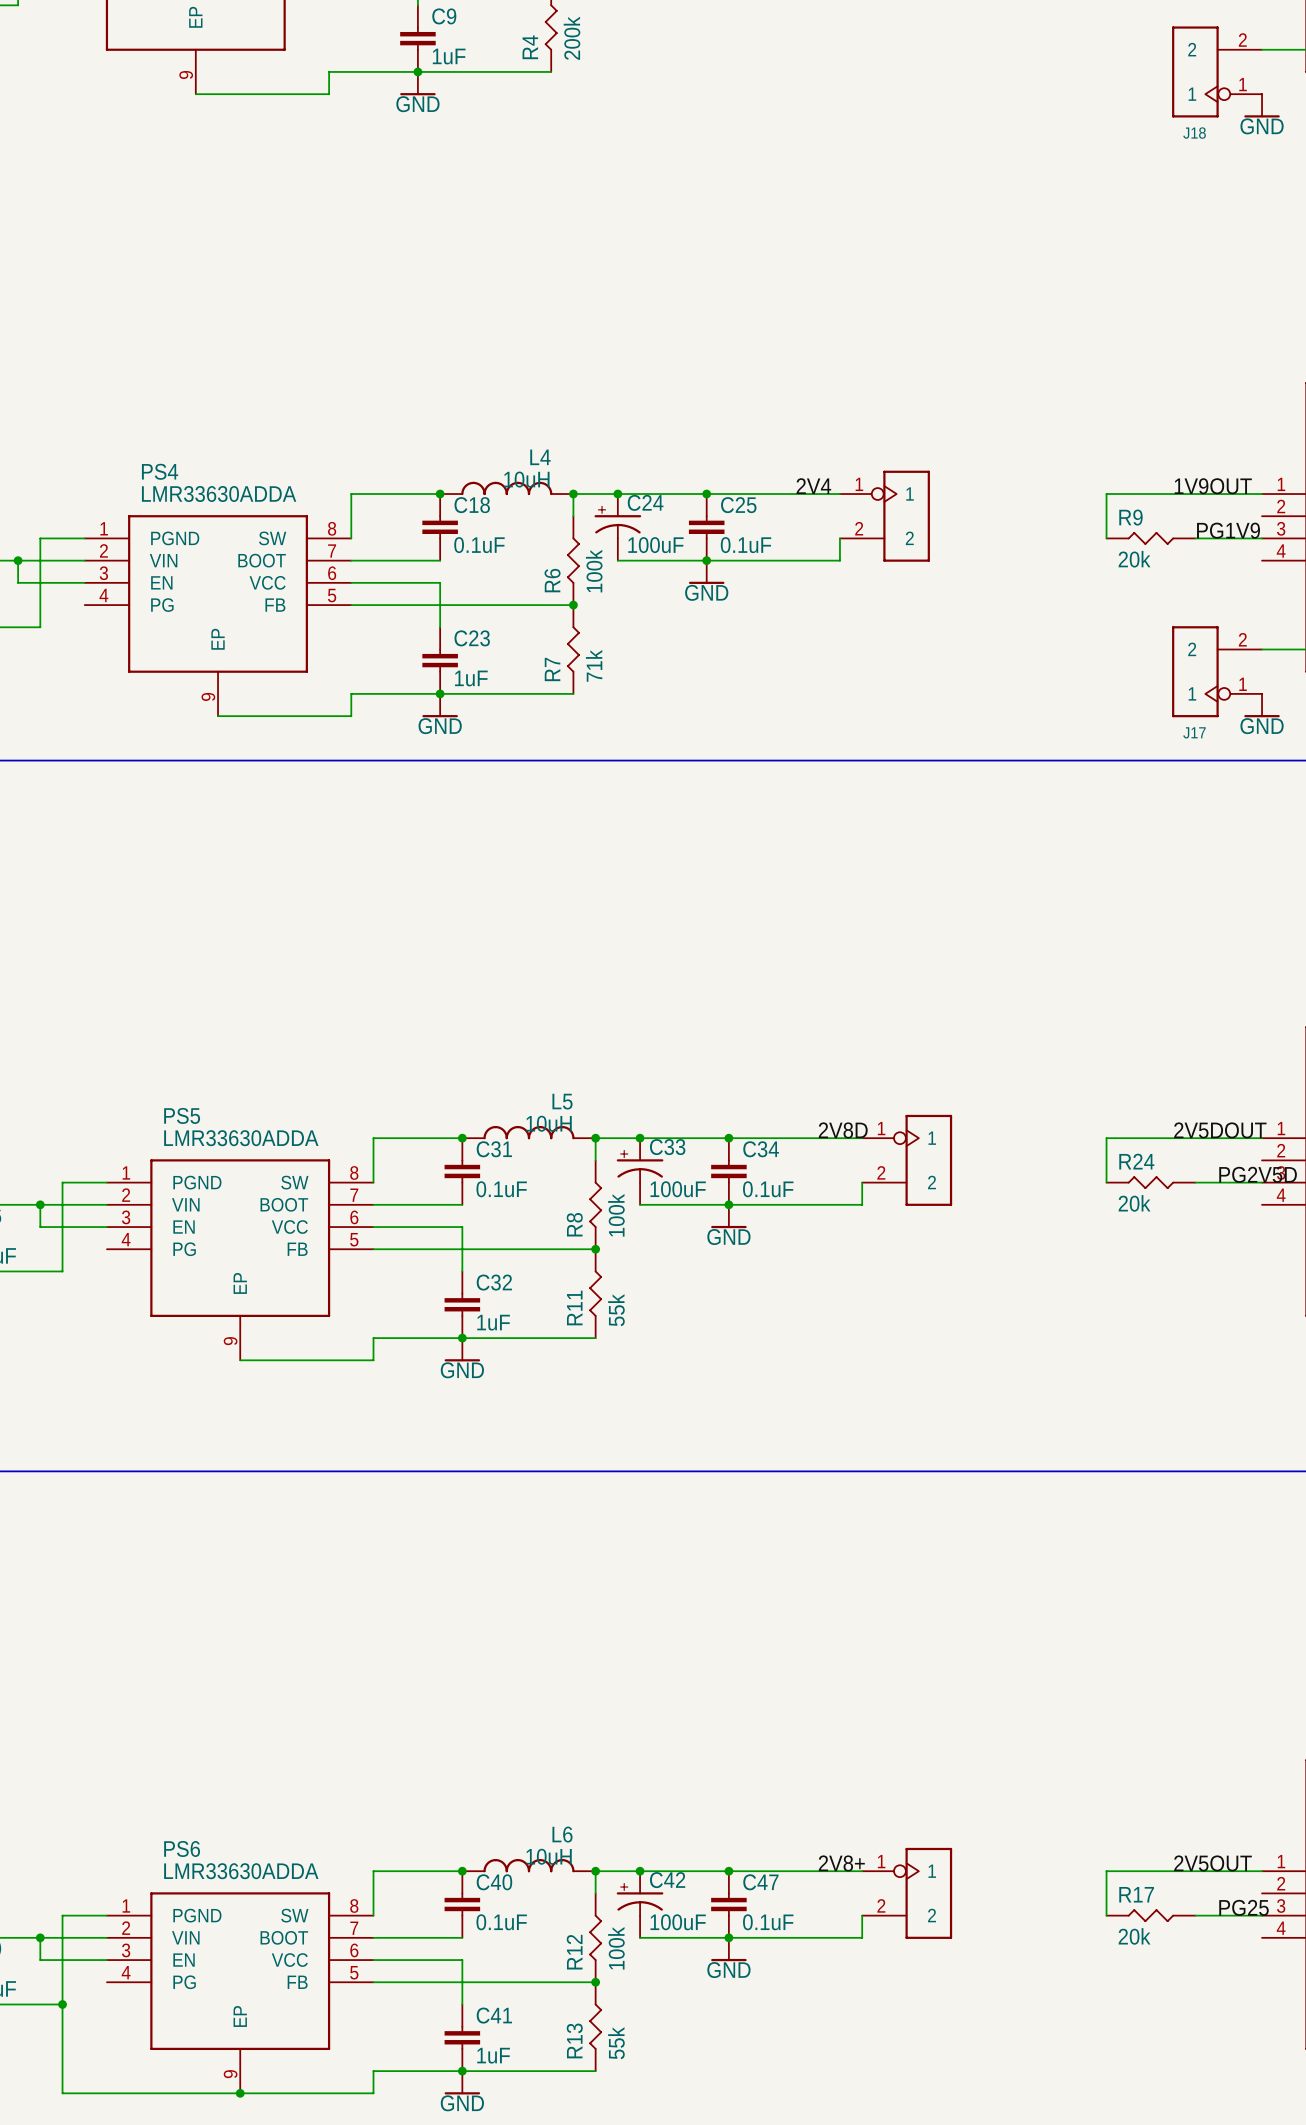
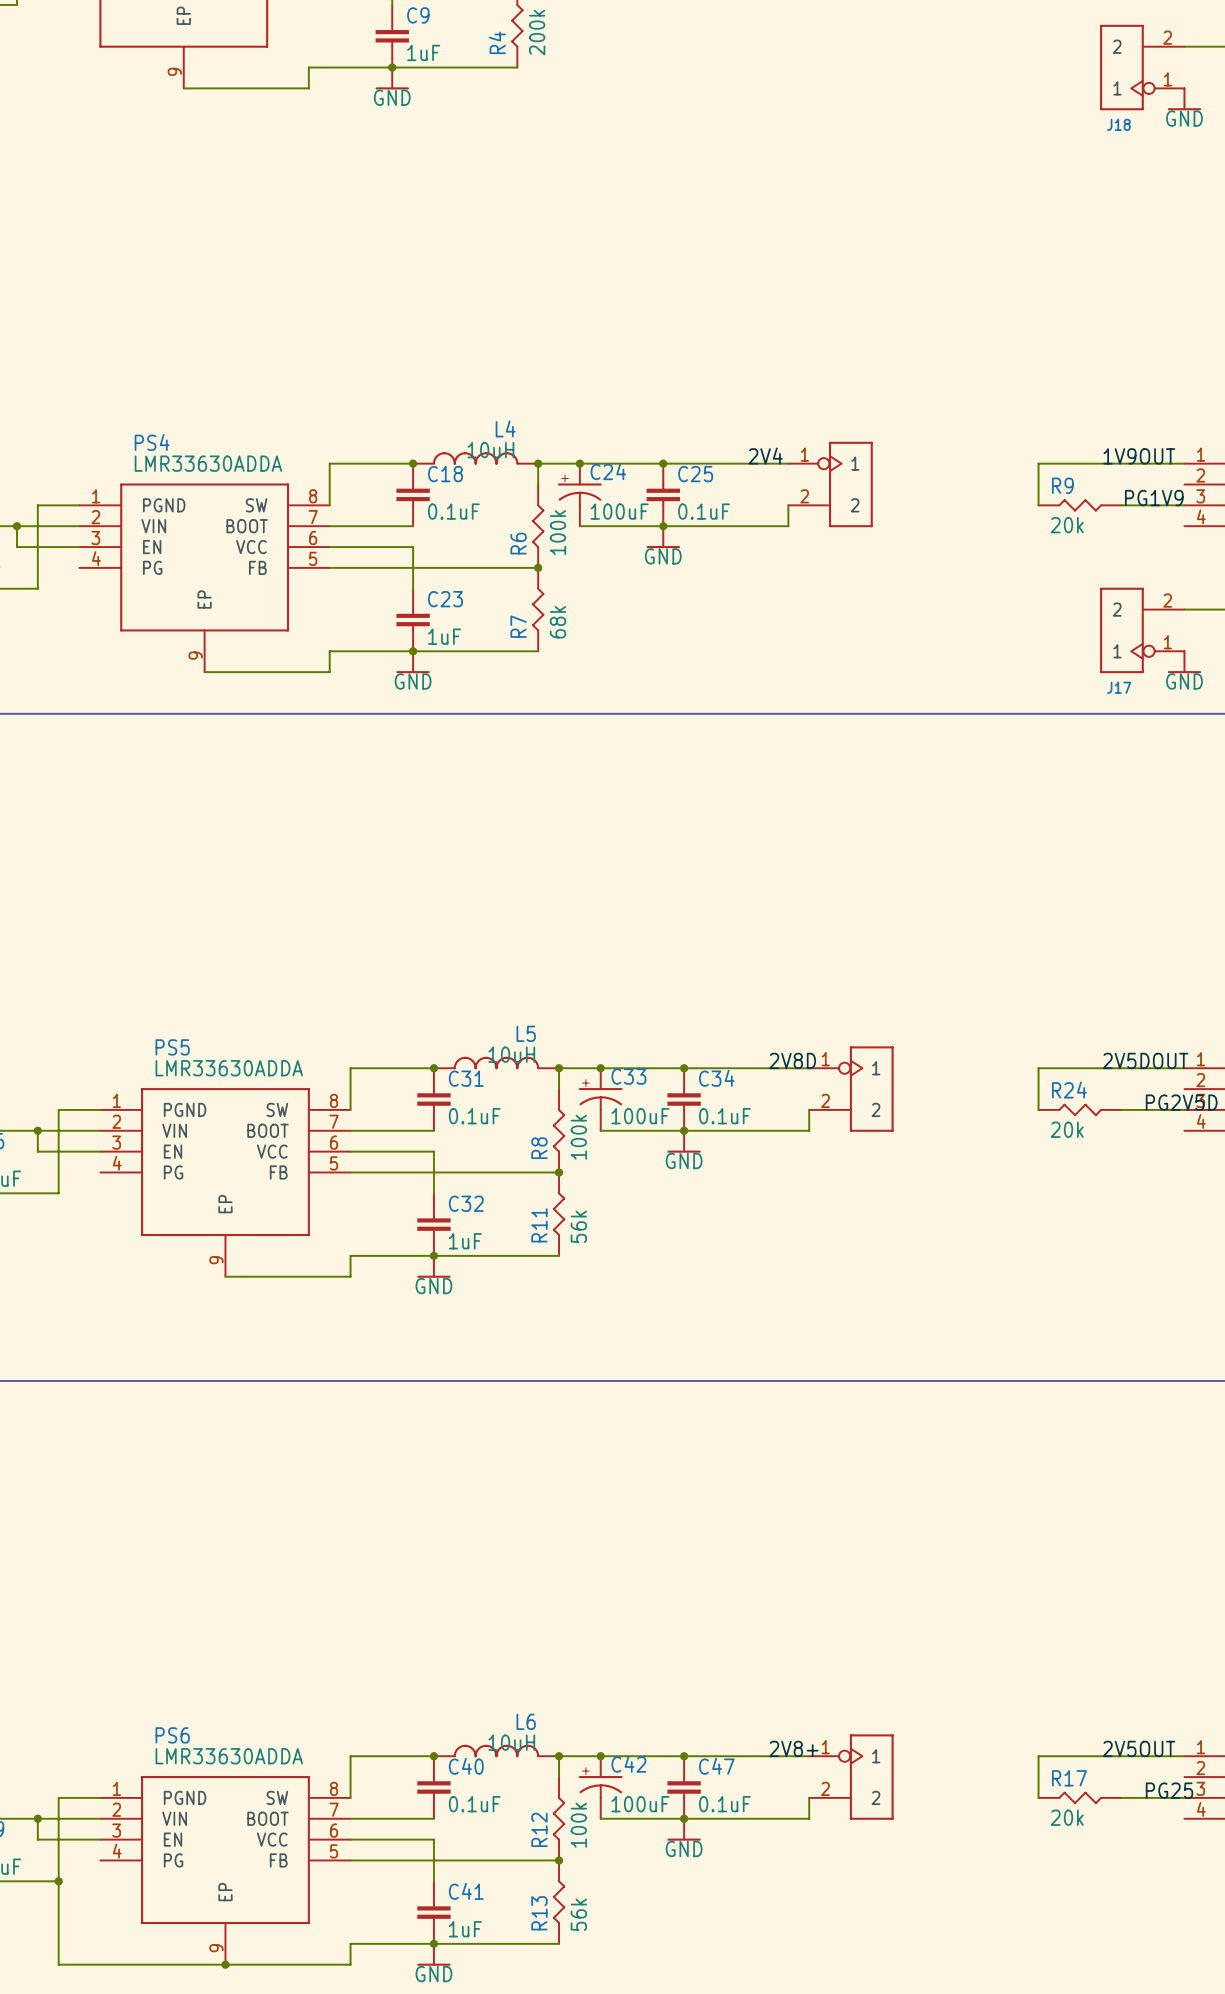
R7 value: 71k (594, 665) -> 68k (557, 622)
R11 value: 55k (616, 1310) -> 56k (578, 1226)
R13 value: 55k (616, 2043) -> 56k (578, 1914)

